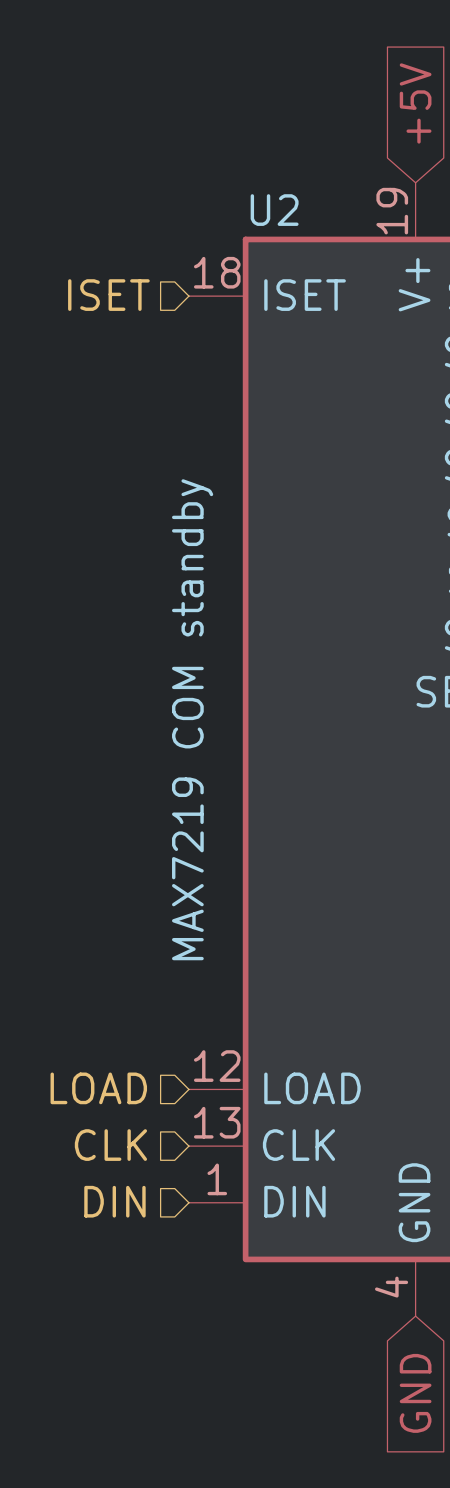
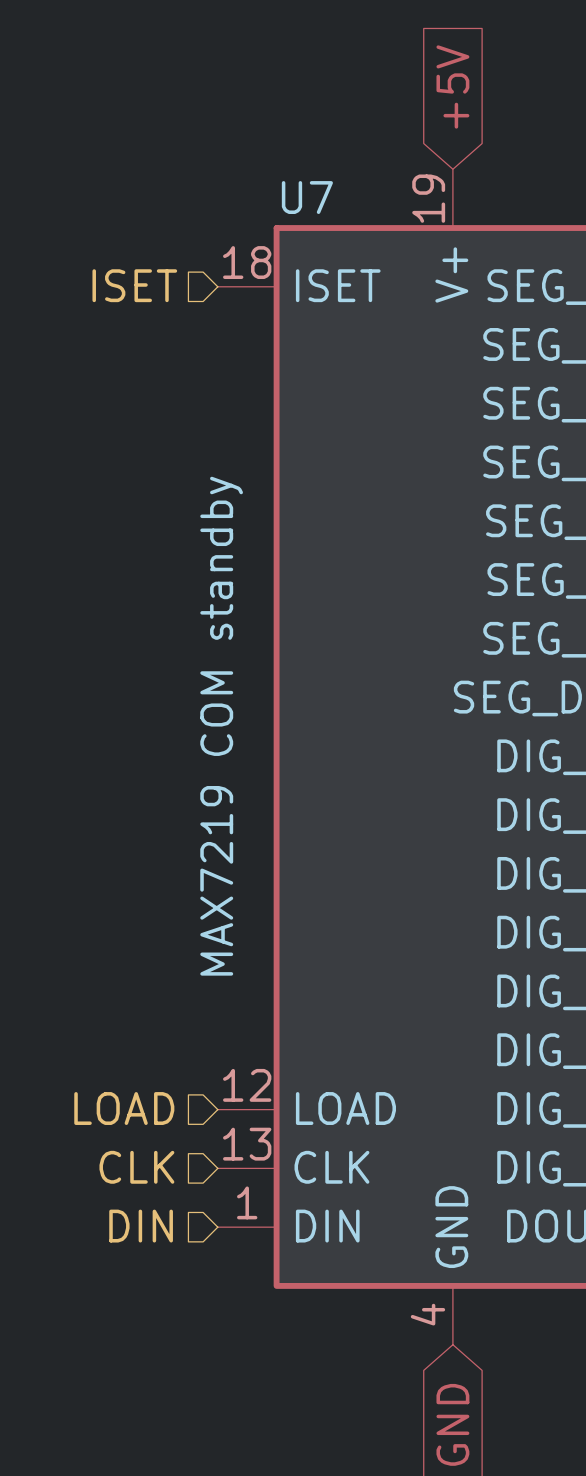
U2 name: U2 (274, 210) -> U7 (307, 197)

